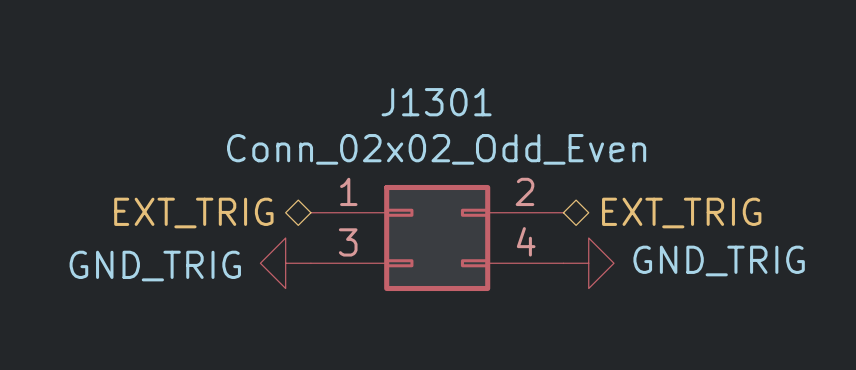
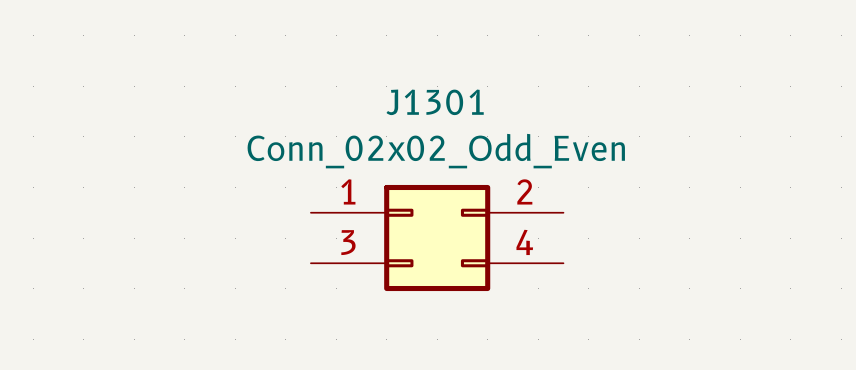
hierarchical label: EXT_TRIG (193, 213) -> none
hierarchical label: EXT_TRIG (681, 213) -> none
power symbol: GND_TRIG (285, 263) -> none
power symbol: GND_TRIG (588, 263) -> none

